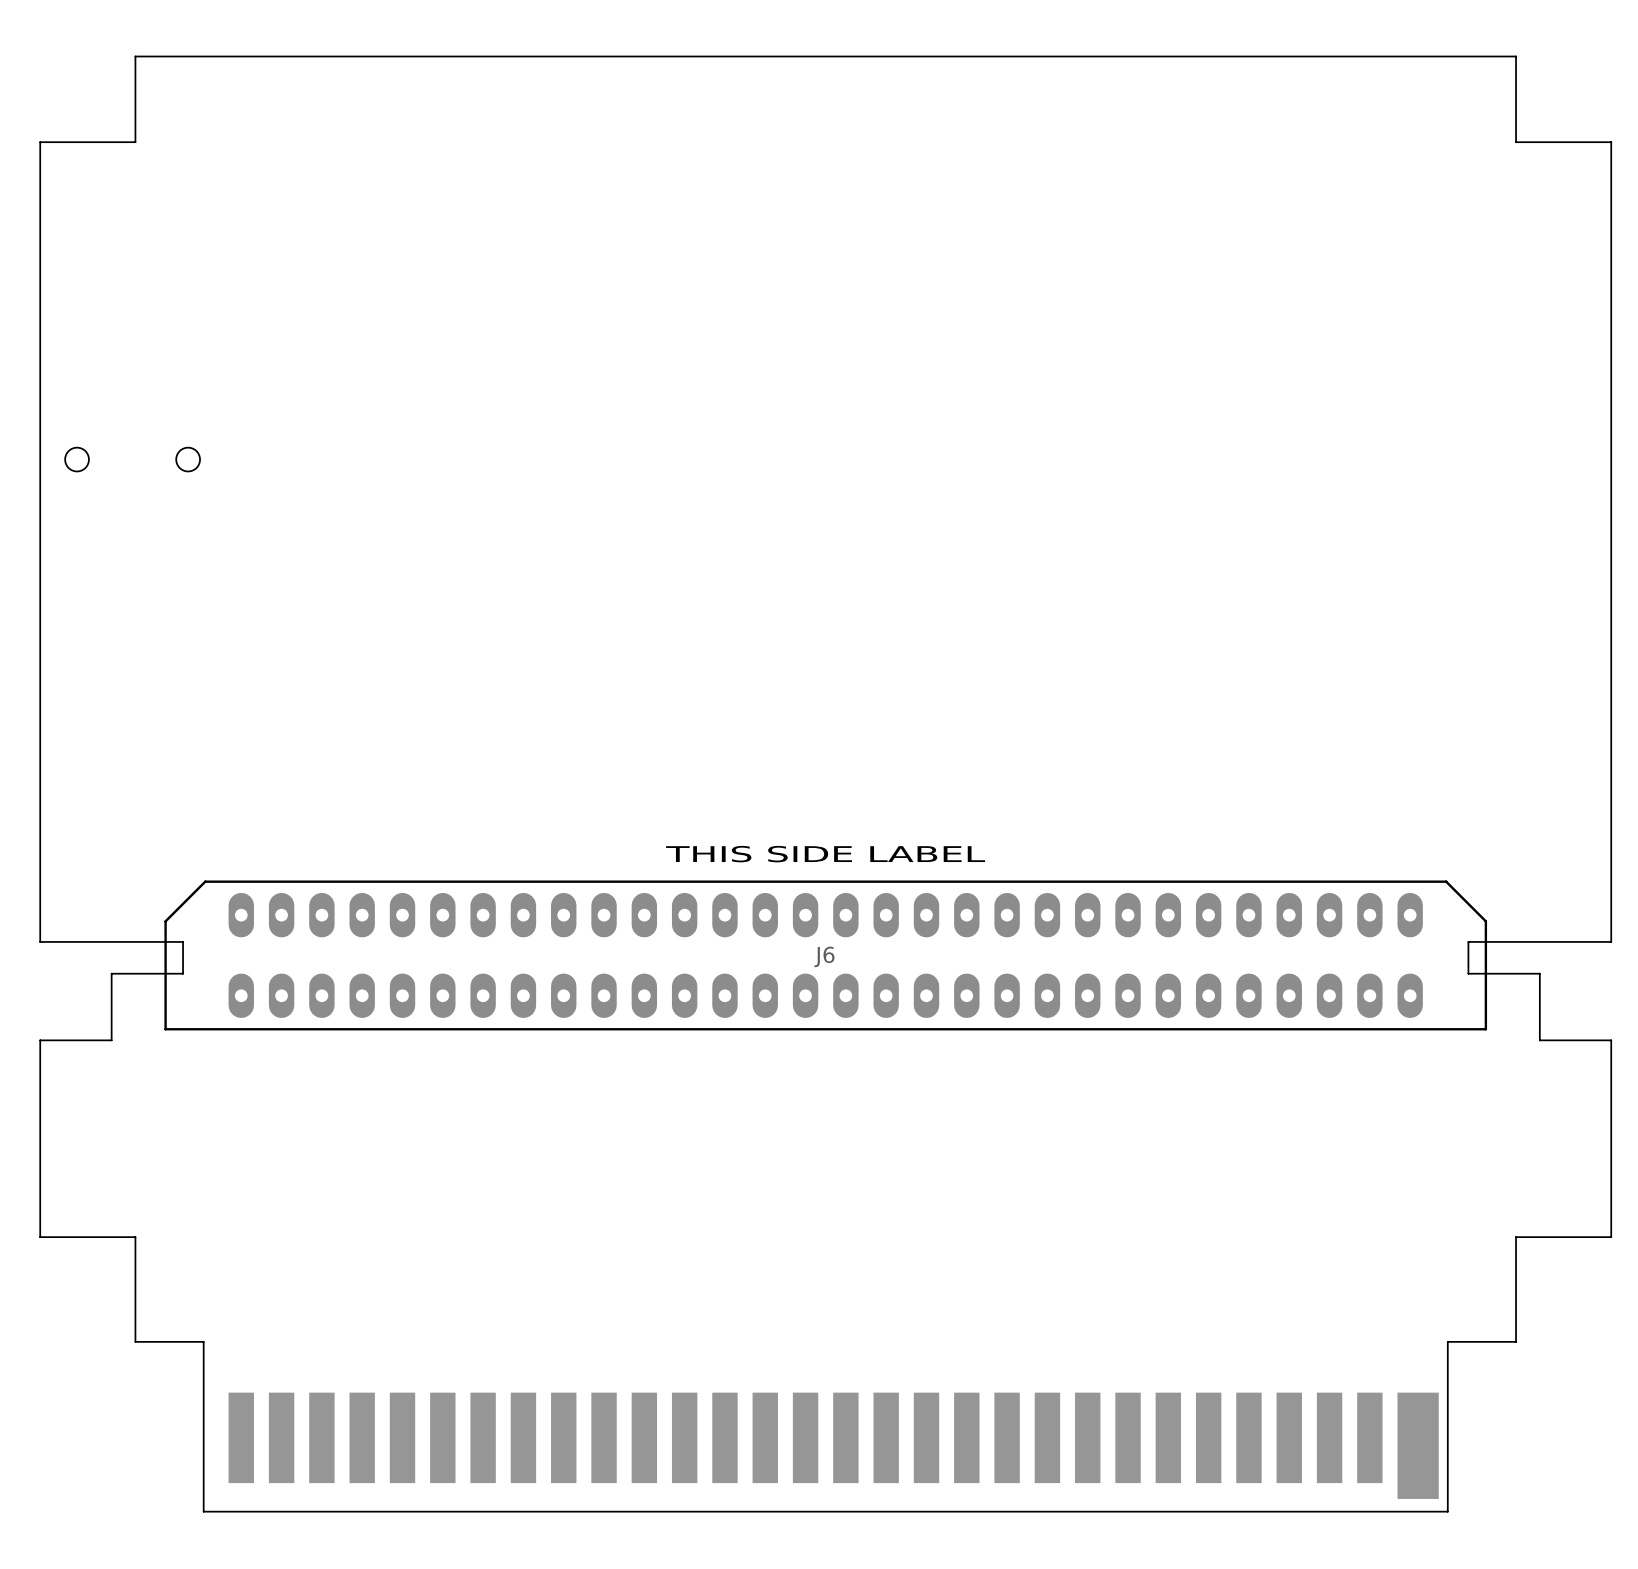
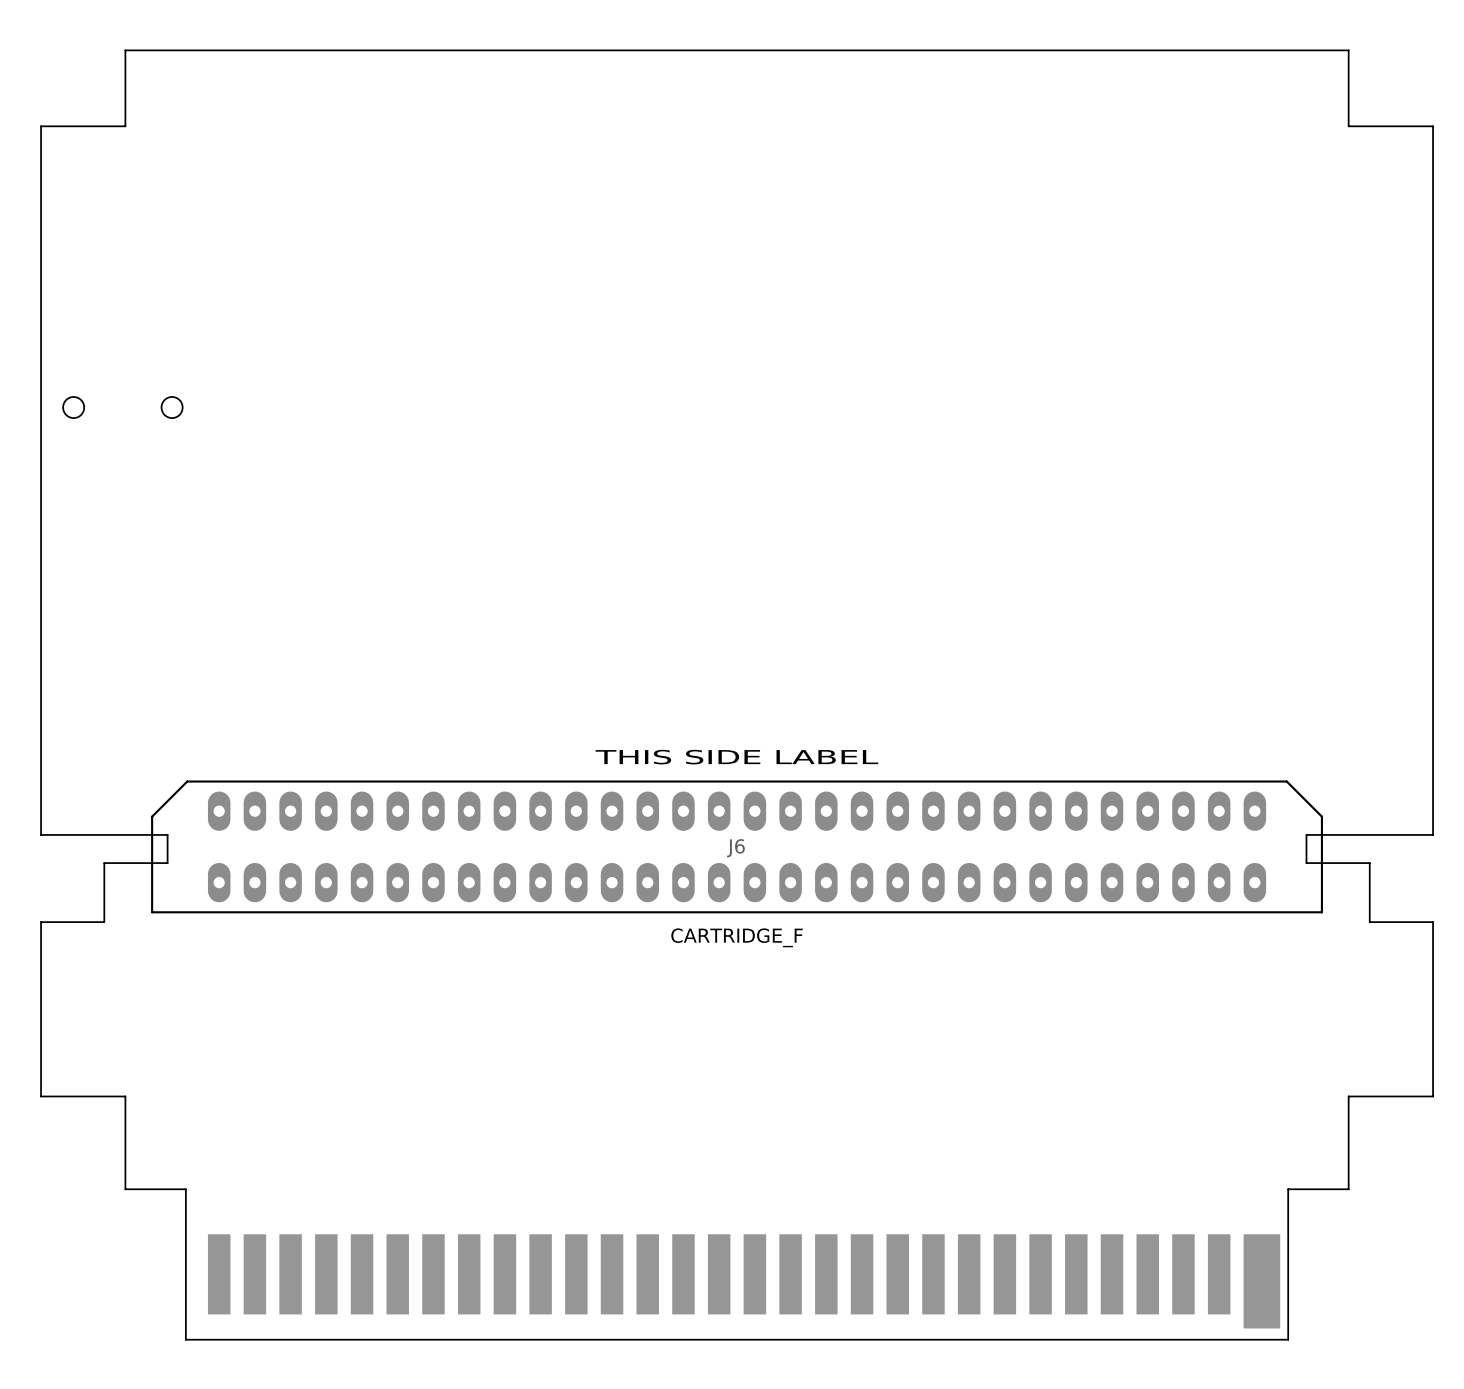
J6 value: none -> CARTRIDGE_F (737, 937)

